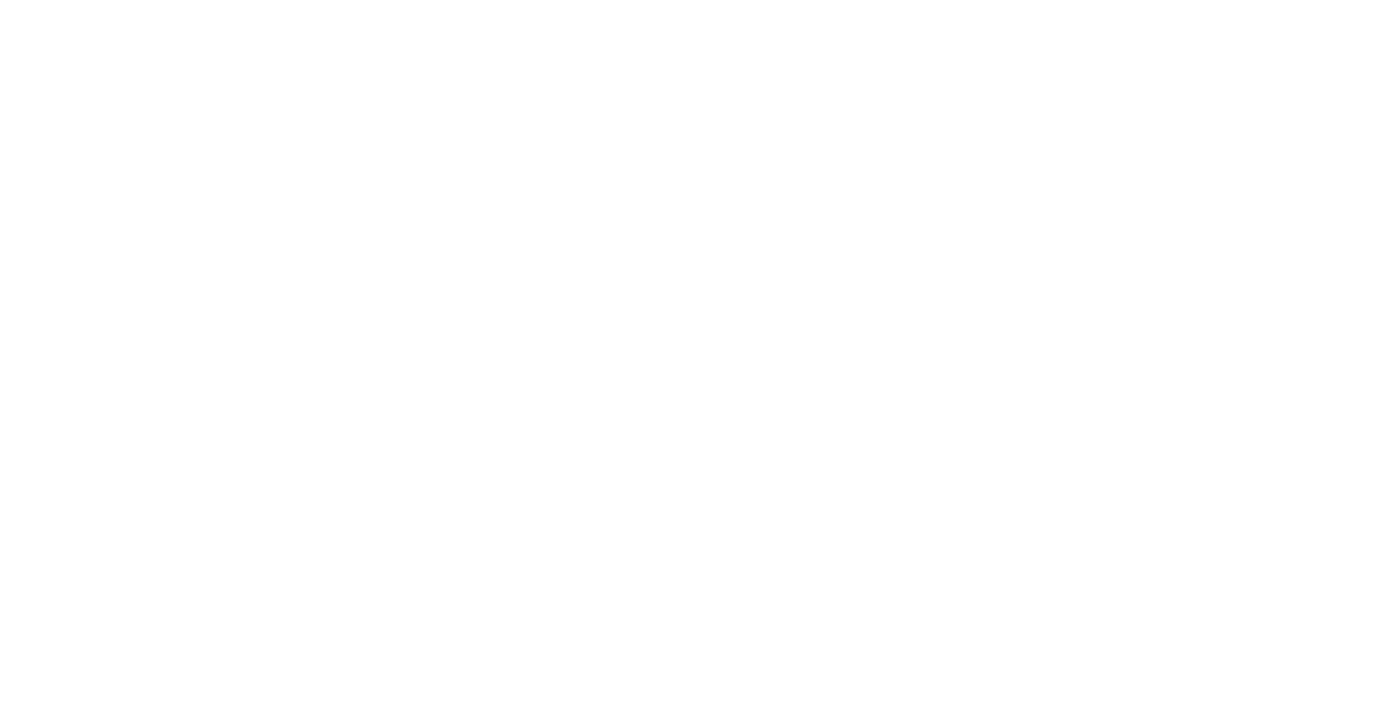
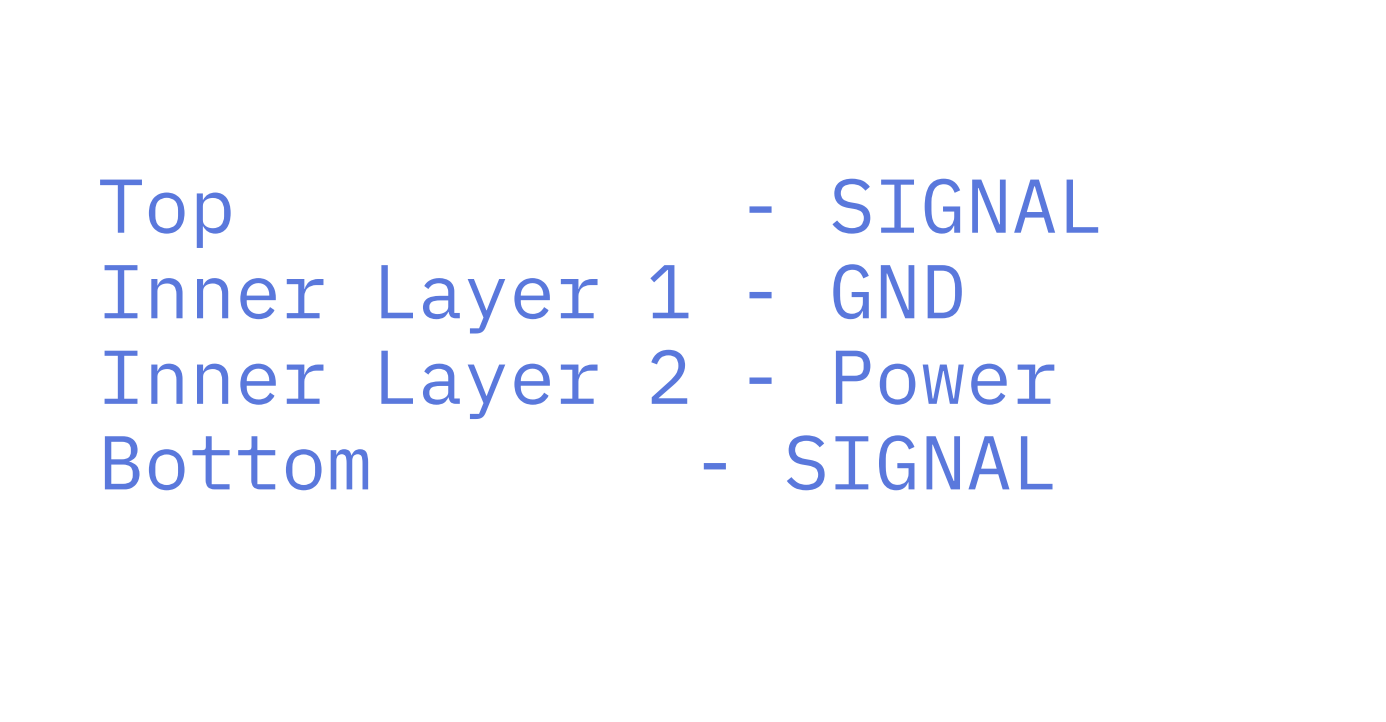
text: none -> Top - SIGNAL (599, 213)
text: none -> Inner Layer 1 - GND (533, 298)
text: none -> Inner Layer 2 - Power (579, 384)
text: none -> Bottom - SIGNAL (578, 462)

